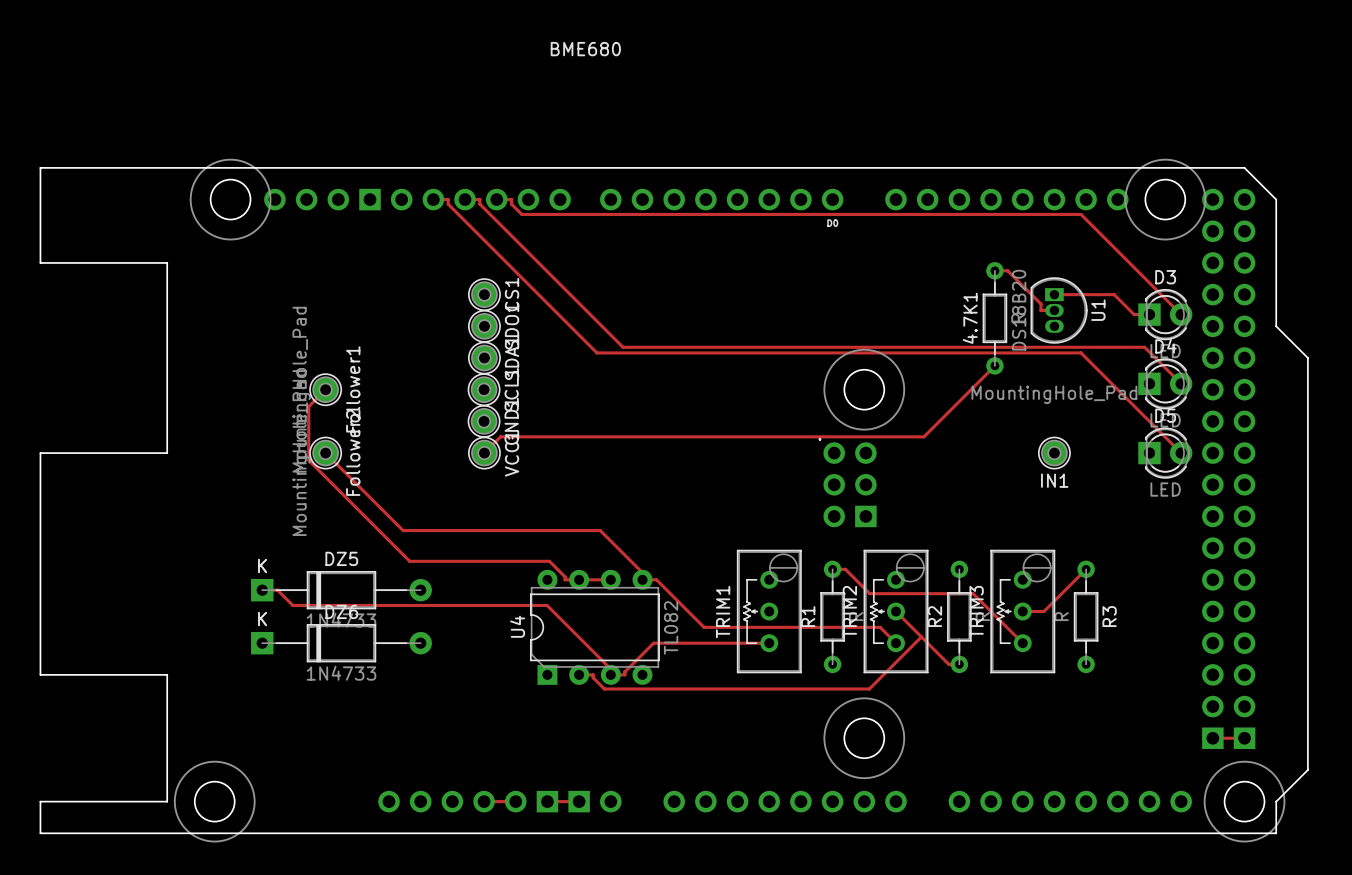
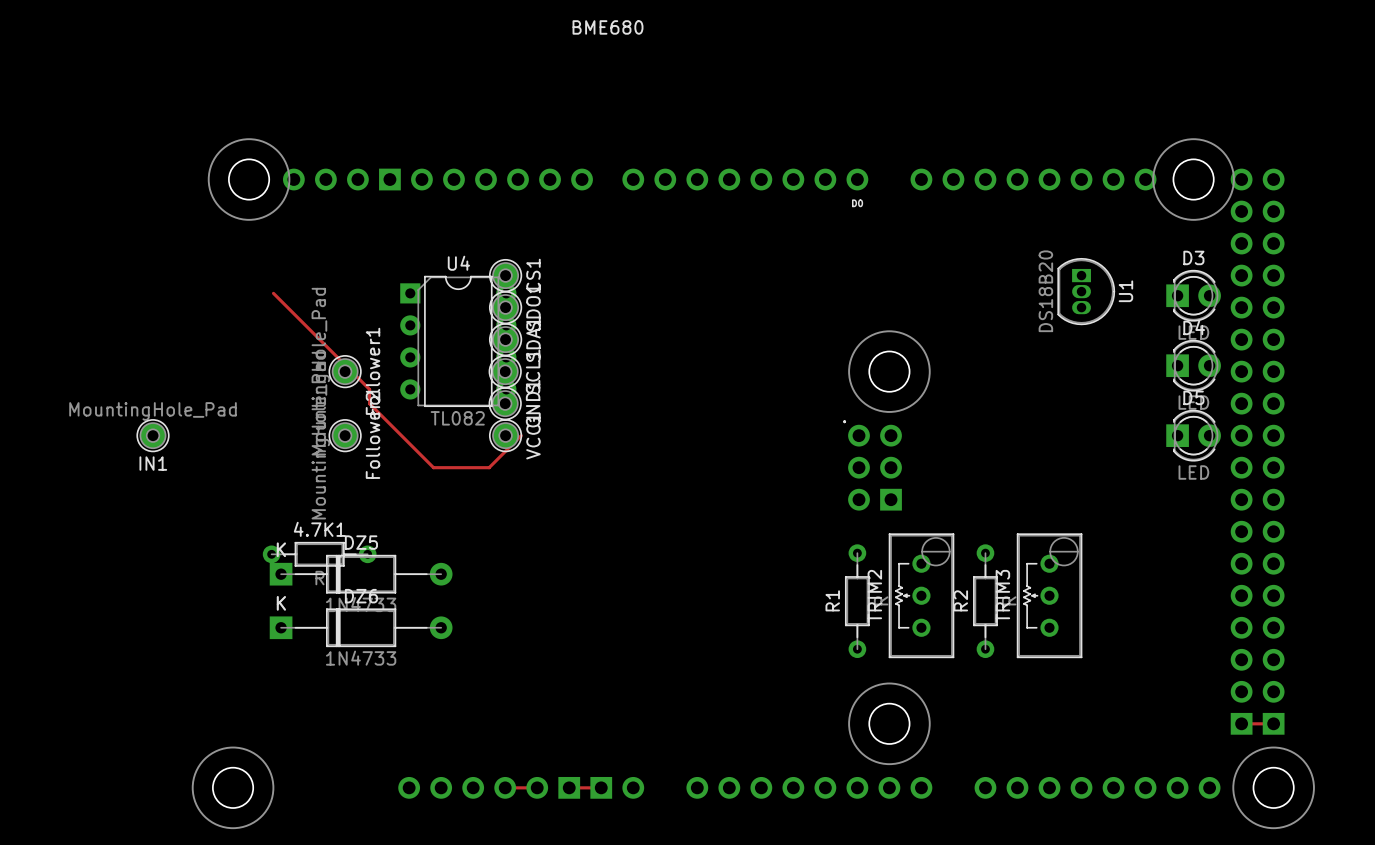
board edge: (40, 167) (40, 262) (167, 262) (167, 453) (40, 453) (40, 674) (167, 674) (167, 801) (40, 801) (40, 833) (1276, 833) (1276, 801) (1307, 769) (1307, 358) (1276, 326) (1276, 199) (1244, 167) (40, 167) -> none
track: (433, 199) (448, 199) (448, 204) (596, 352) (1081, 352) (1181, 453) -> none
track: (465, 199) (479, 199) (479, 204) (623, 347) (1144, 347) (1181, 383) -> none
track: (496, 199) (511, 199) (511, 204) (521, 214) (1081, 214) (1181, 314) -> none
track: (994, 270) (1007, 270) (1040, 304) (1040, 310) (1054, 310) -> none
track: (1054, 294) (1114, 294) (1134, 314) (1149, 314) -> none
track: none -> (273, 293) (369, 389) (369, 403) (433, 467) (489, 467) (521, 435)
4.7K1 rotation: 0° (994, 318) -> 90° clockwise (319, 554)
4.7K1 position: (994, 318) -> (319, 554)
track: (994, 365) (923, 436) (500, 436) (484, 453) -> none
track: (325, 389) (308, 406) (308, 460) (409, 561) (549, 561) (565, 576) (565, 579) (610, 579) -> none
IN1 value position: MountingHole_Pad (1054, 394) -> MountingHole_Pad (153, 411)
track: (325, 453) (403, 530) (600, 530) (649, 579) -> none
IN1 position: (1054, 453) -> (153, 435)
track: (832, 569) (845, 569) (869, 593) (973, 593) (1022, 643) -> none
track: (1086, 569) (1043, 611) (1022, 611) -> none
track: (642, 579) (656, 579) (704, 627) (880, 627) (895, 643) -> none
track: (262, 590) (277, 590) (292, 605) (547, 605) (616, 674) -> none
TRIM1: (769, 611) -> none
track: (895, 611) (948, 664) (959, 664) -> none
R3: R (1086, 616) -> none
U4 rotation: 0° (594, 627) -> 90° clockwise (458, 341)
U4 position: (594, 627) -> (458, 341)
track: (921, 636) (869, 688) (604, 688) (593, 677) (593, 674) (579, 674) -> none
track: (769, 643) (653, 643) (624, 671) (624, 674) (610, 674) -> none

